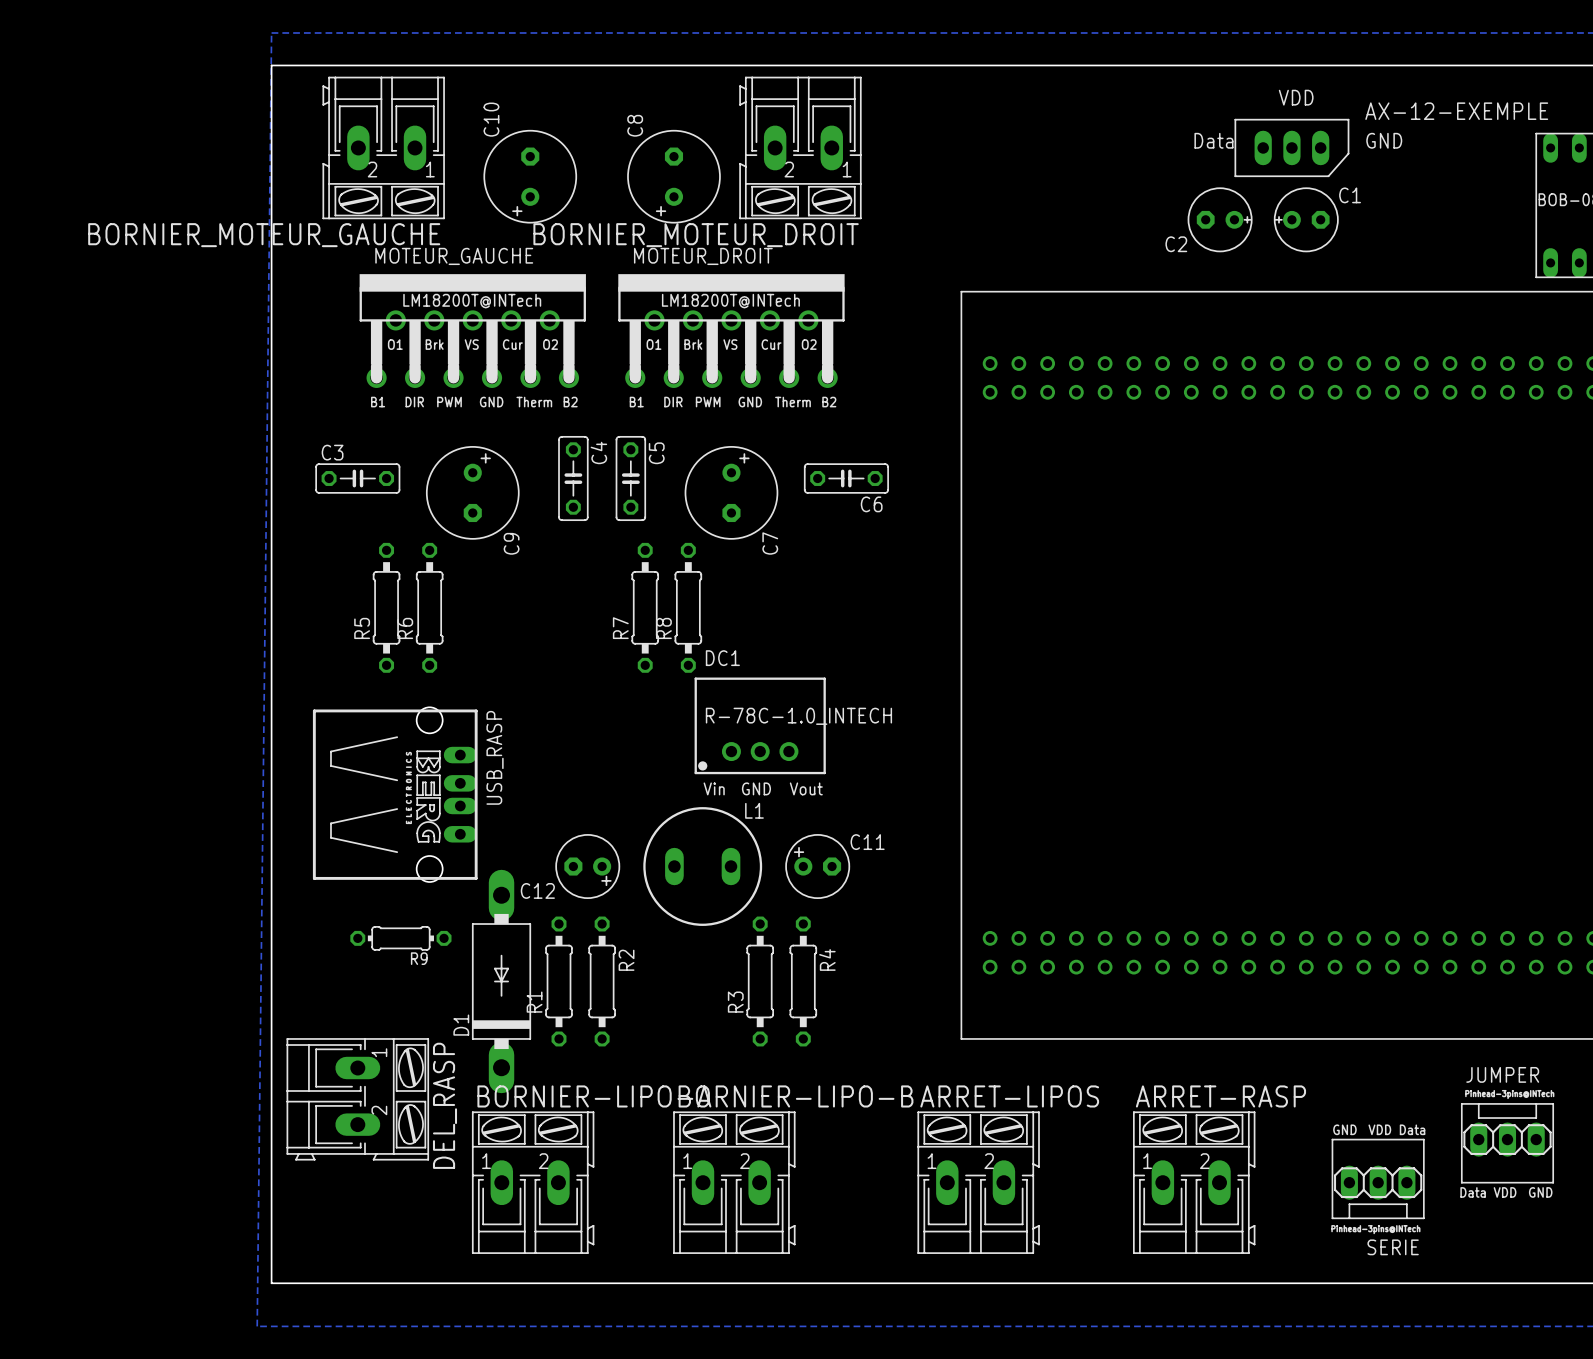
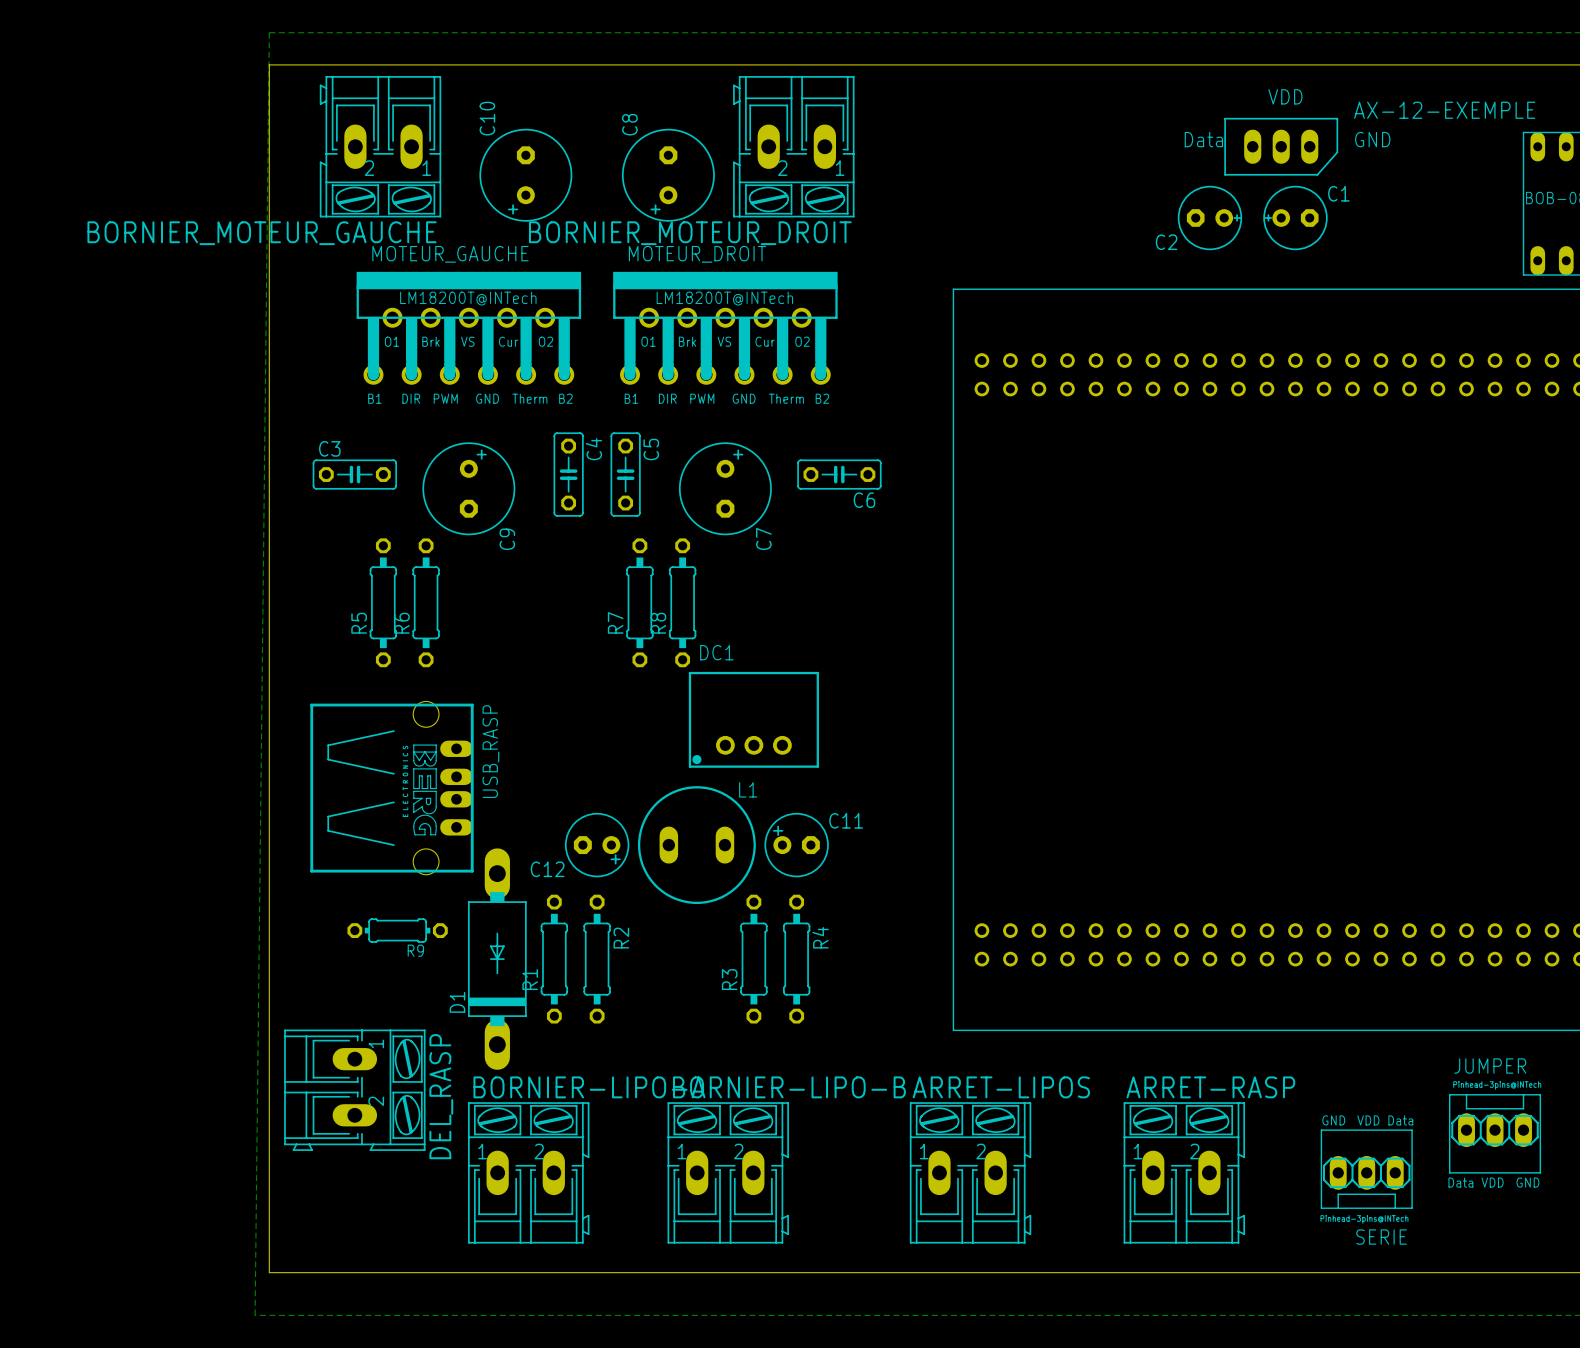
DC1 value: R-78C-1.0_INTECH (798, 716) -> none
DC1 text: Vin (714, 788) -> none
DC1 text: GND (756, 788) -> none
DC1 text: Vout (806, 788) -> none
C12 position: (587, 866) -> (597, 845)
L1 position: (702, 866) -> (696, 845)
C11 position: (817, 866) -> (796, 845)
D1 position: (501, 981) -> (497, 959)
R1 position: (559, 981) -> (554, 959)
R2 position: (602, 981) -> (597, 959)
R3 position: (760, 981) -> (753, 959)
R4 position: (803, 981) -> (796, 959)

